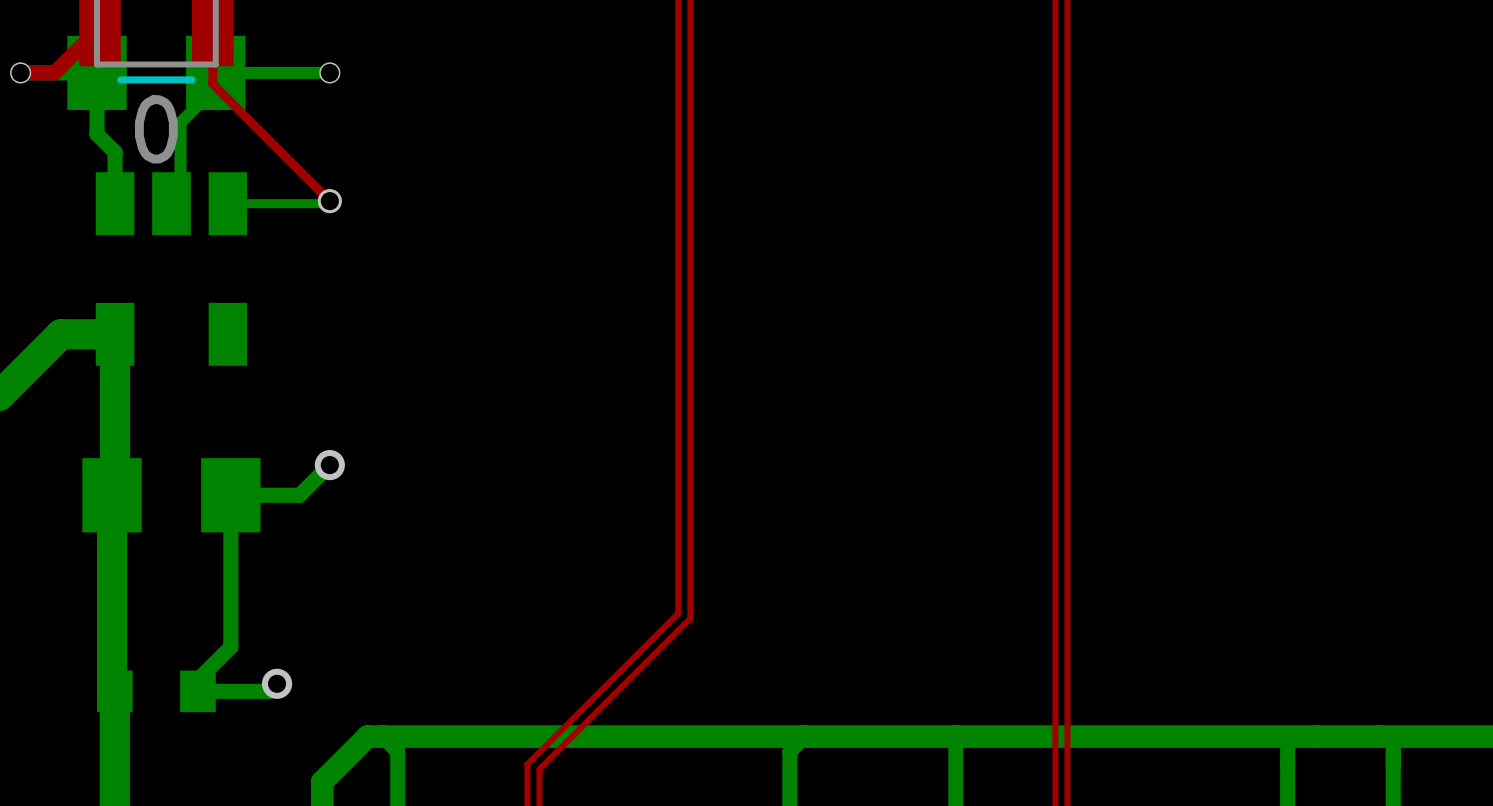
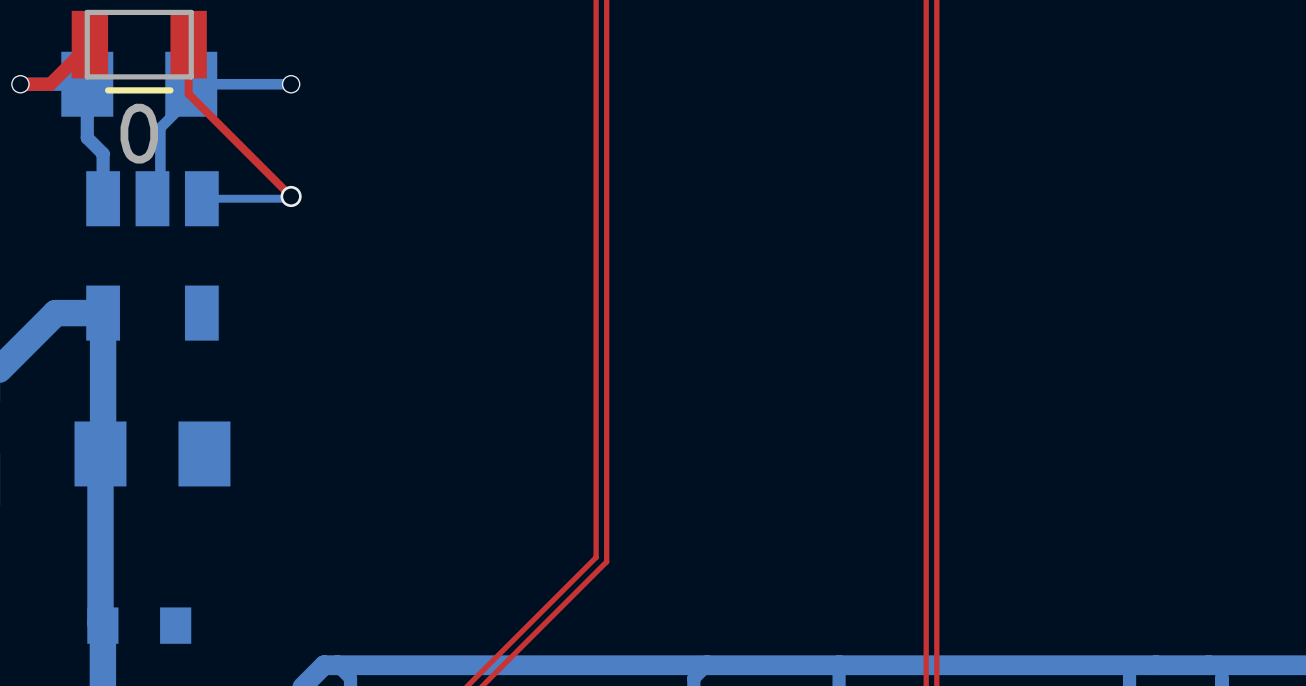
bottom track: (329, 465) (299, 495) (230, 495) (230, 647) (197, 679) (197, 691) (269, 691) (277, 683) -> none
via: (329, 465) -> none
via: (277, 683) -> none

